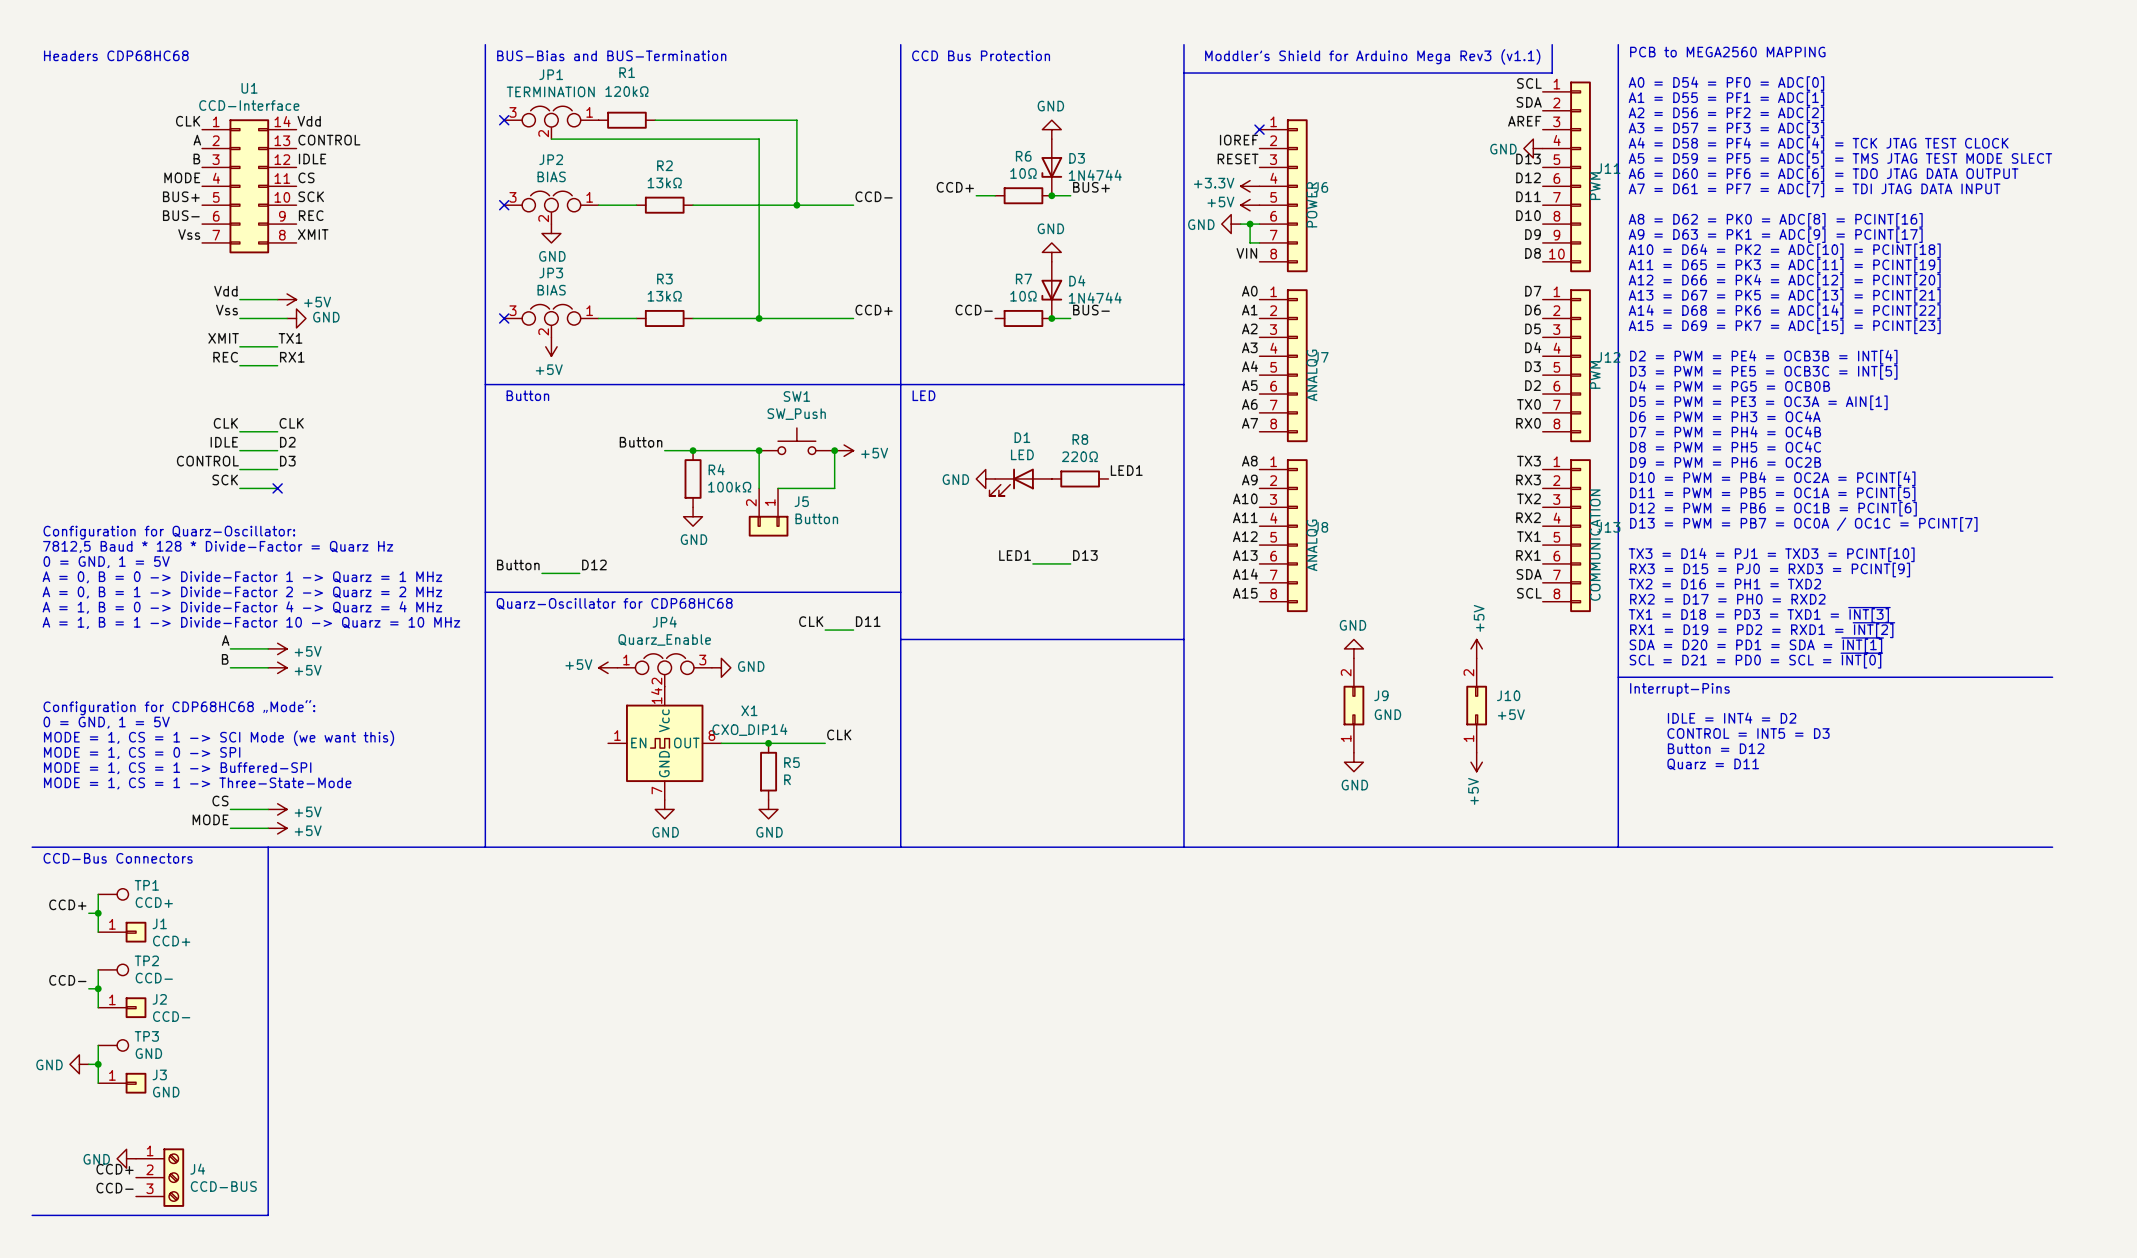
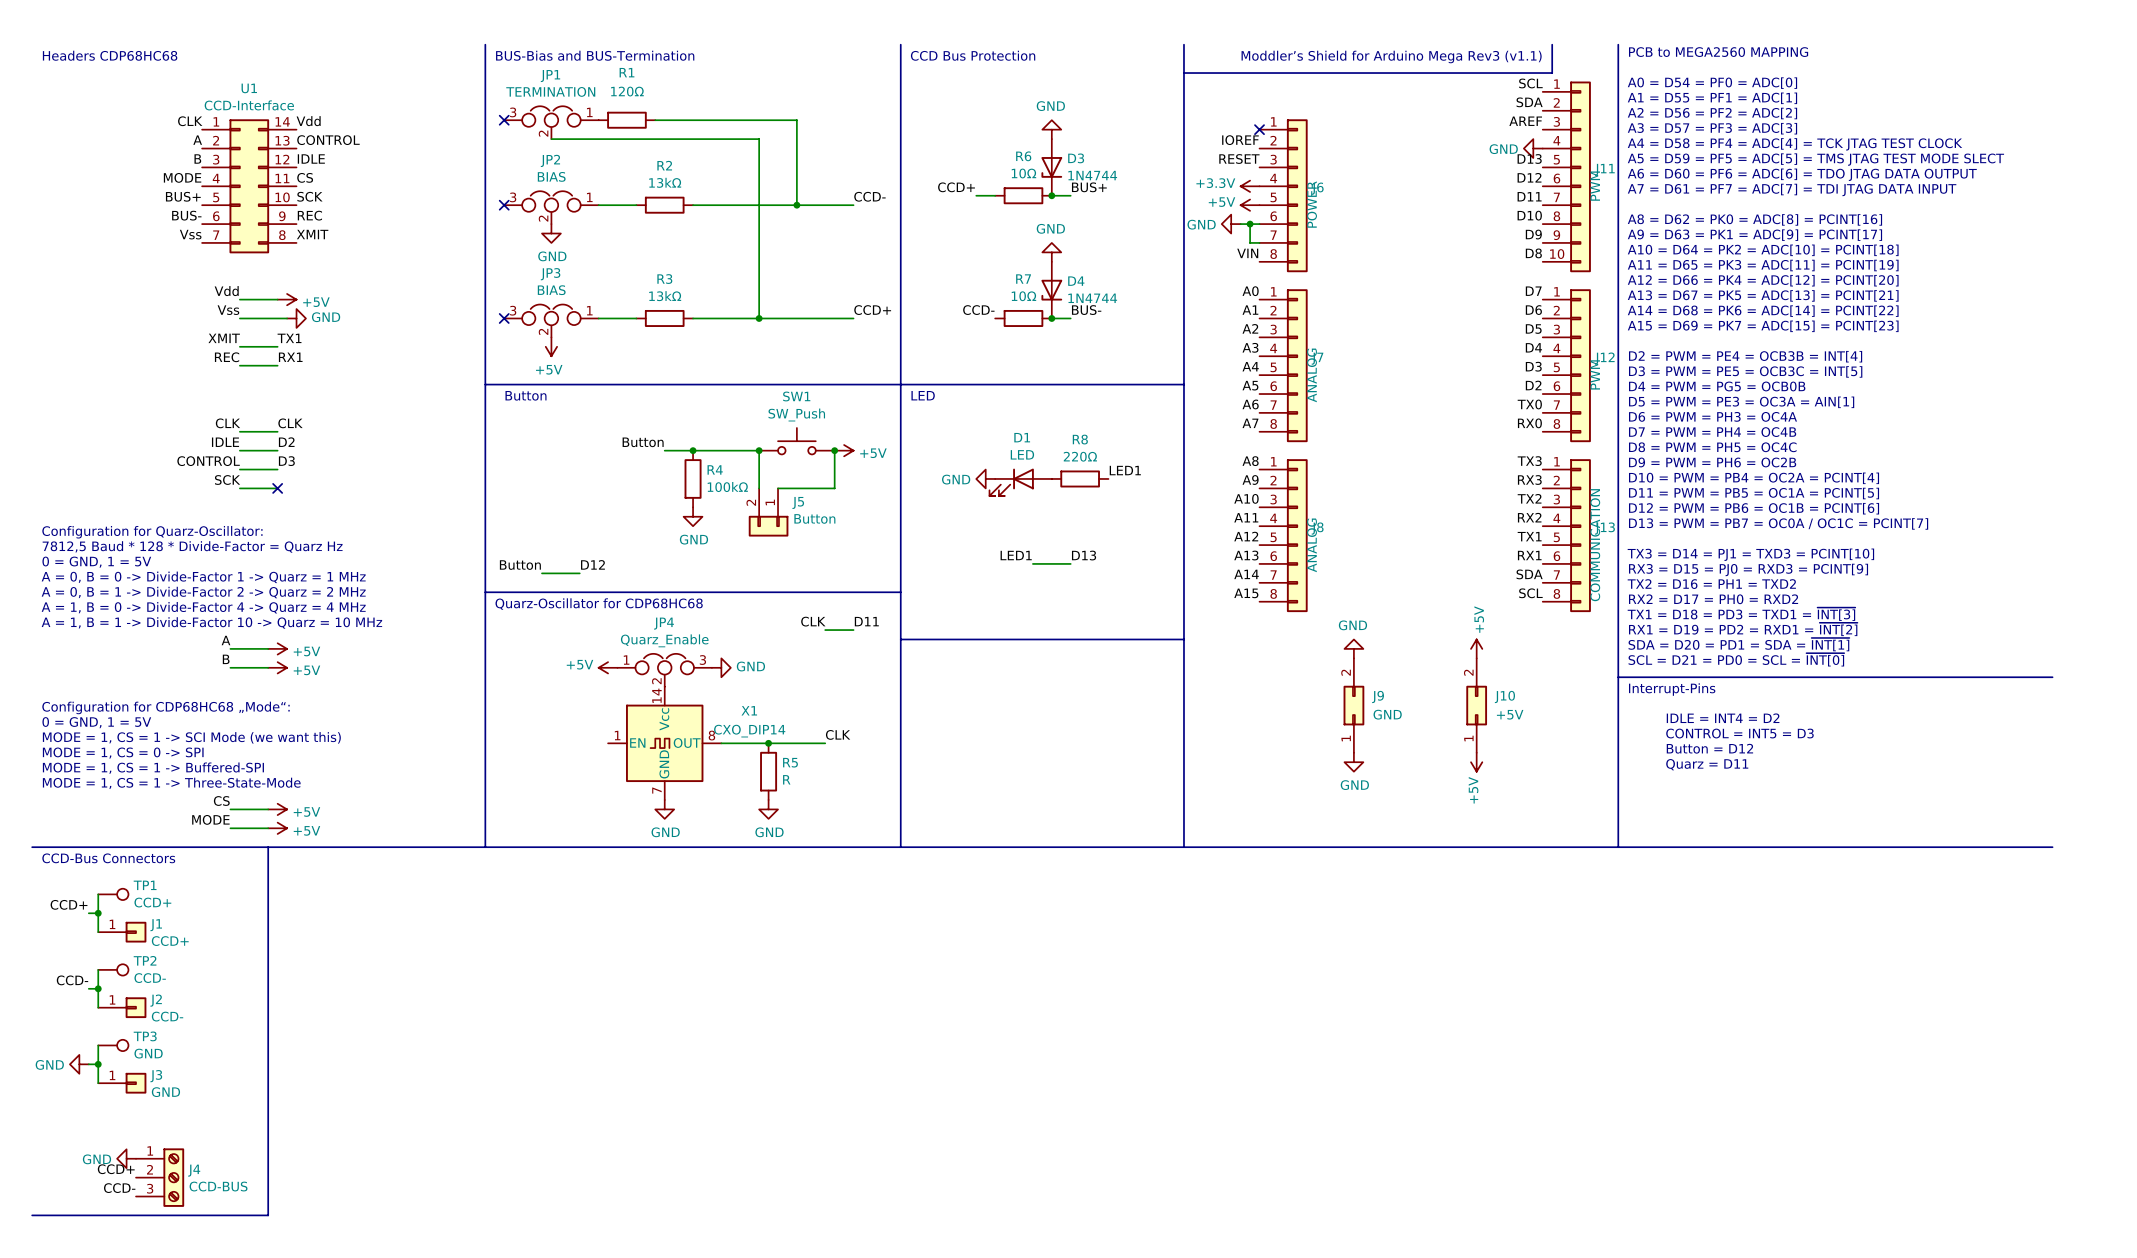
R1 value: 120kΩ (626, 91) -> 120Ω (627, 91)

